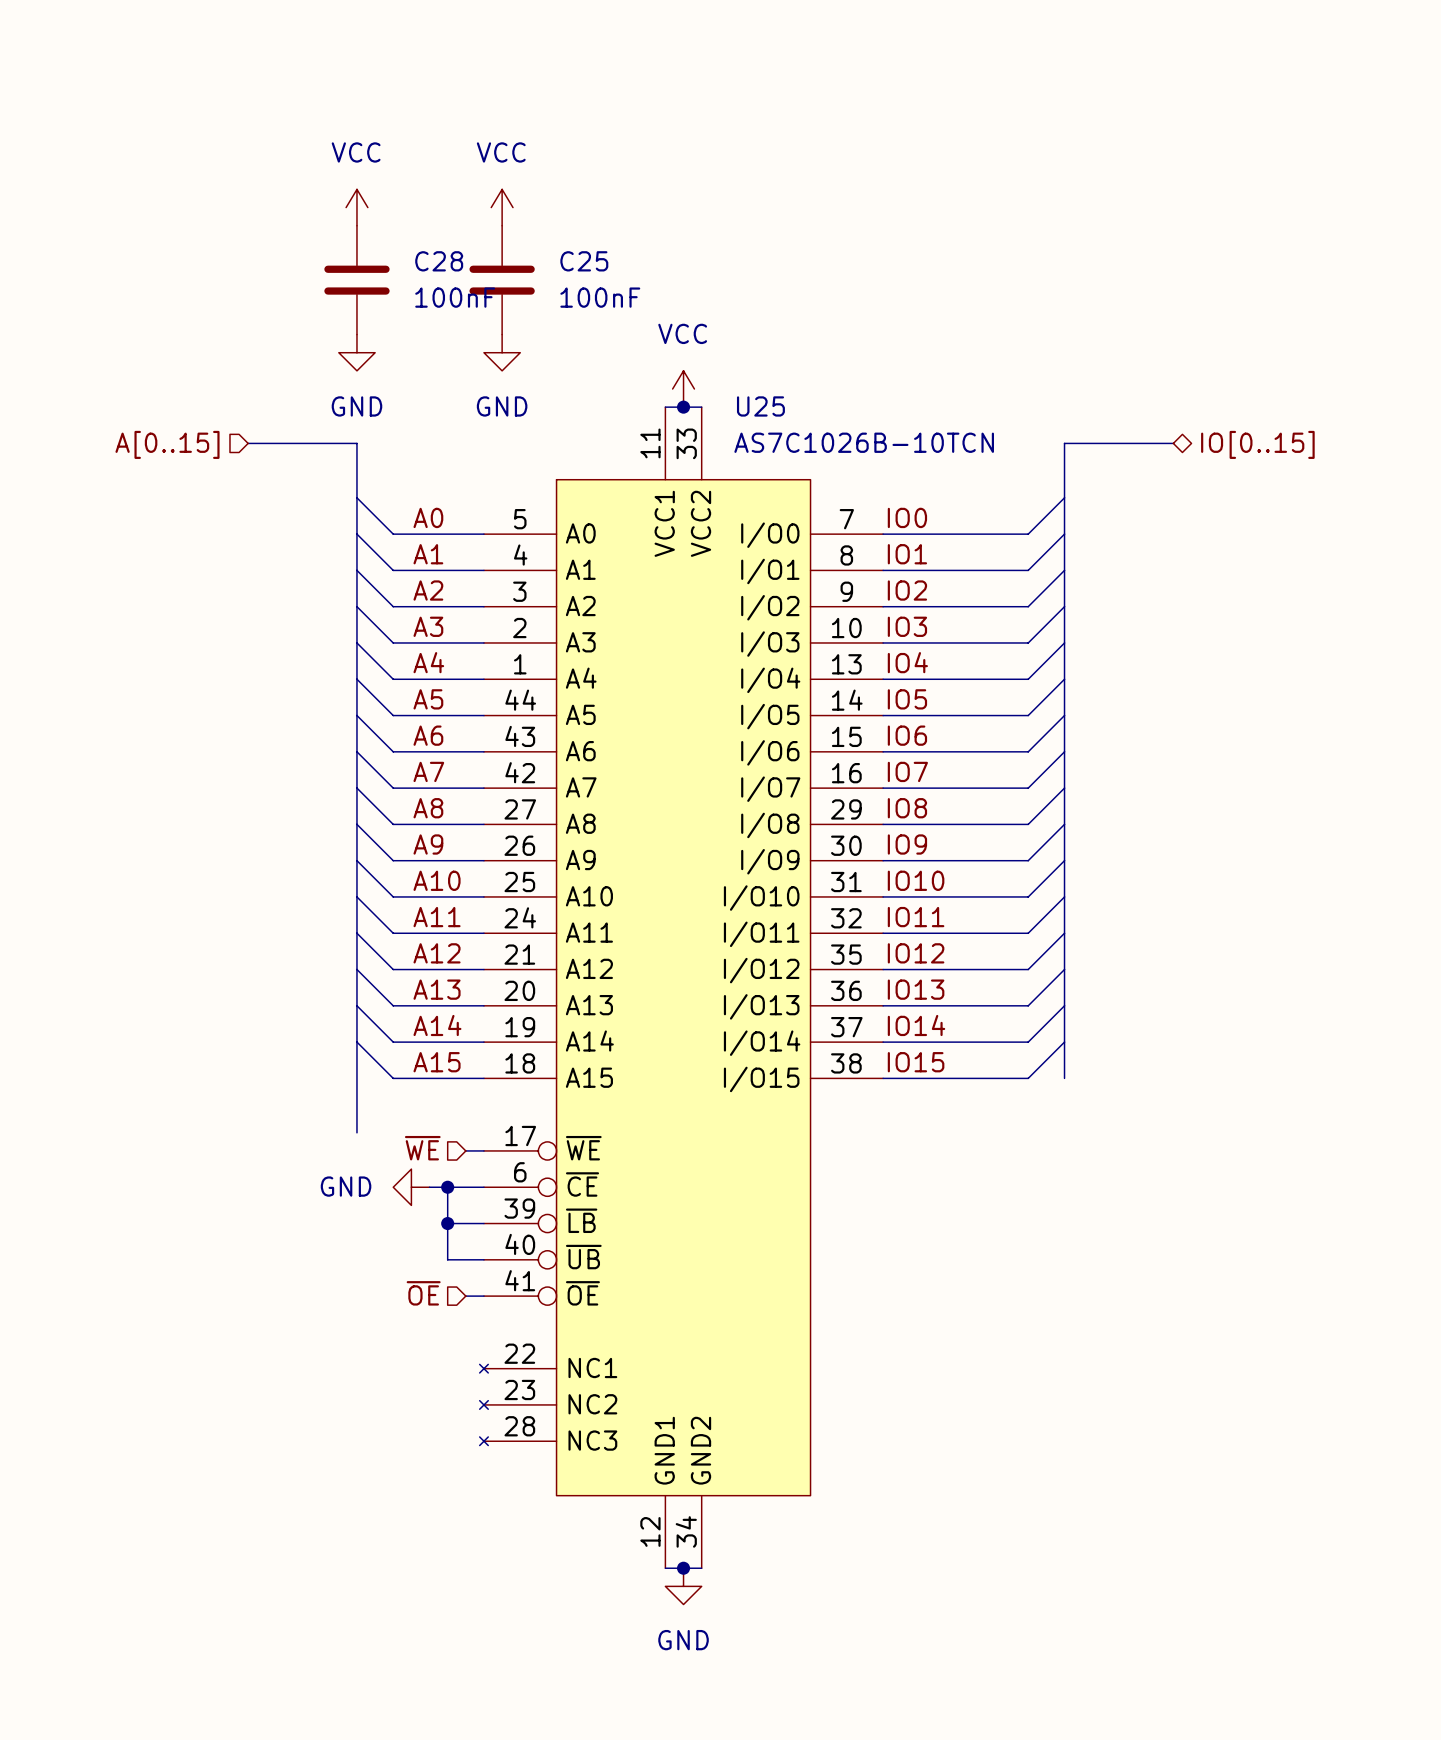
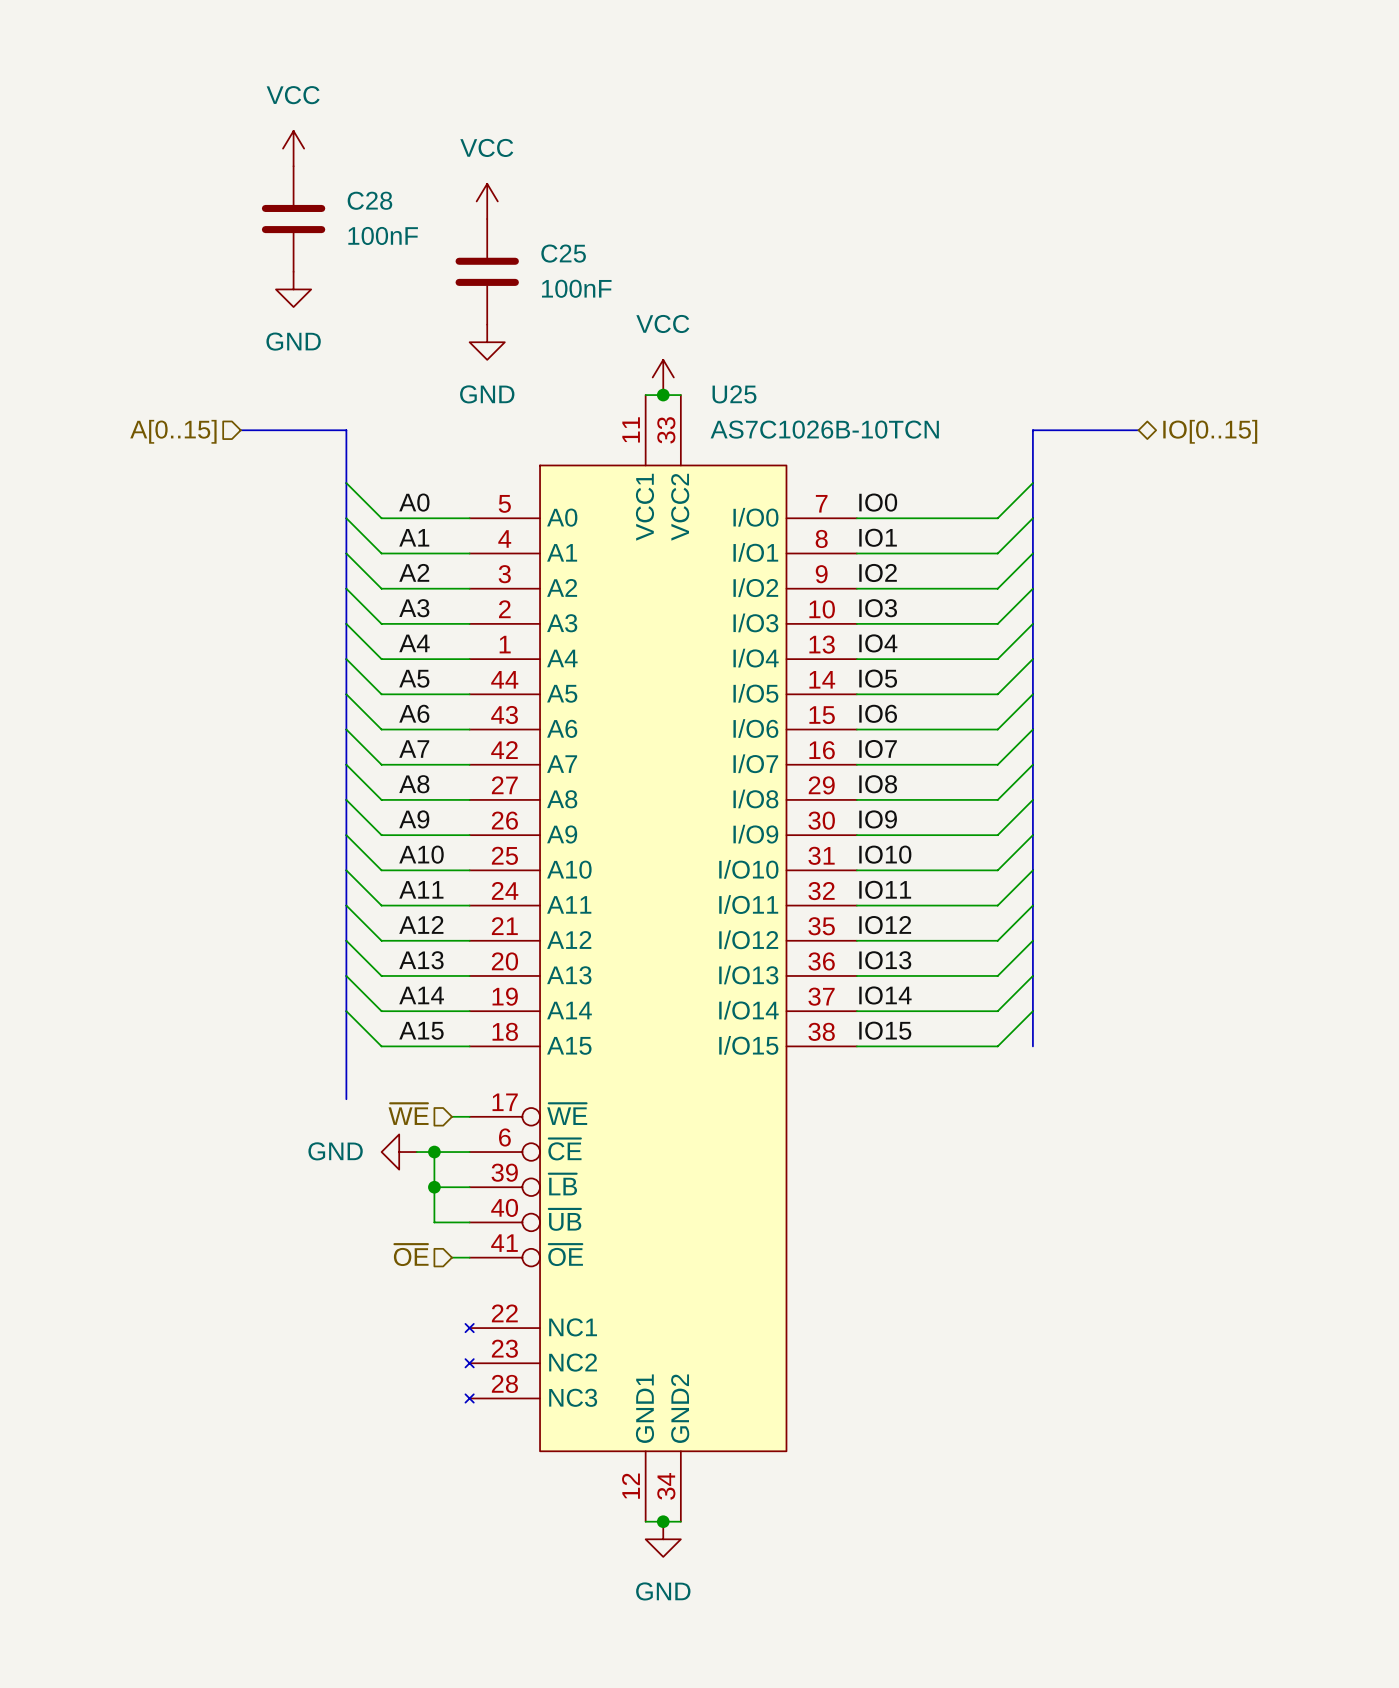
power symbol position: VCC (356, 207) -> VCC (293, 148)
C28 position: (356, 280) -> (293, 219)
power symbol position: GND (356, 352) -> GND (293, 289)

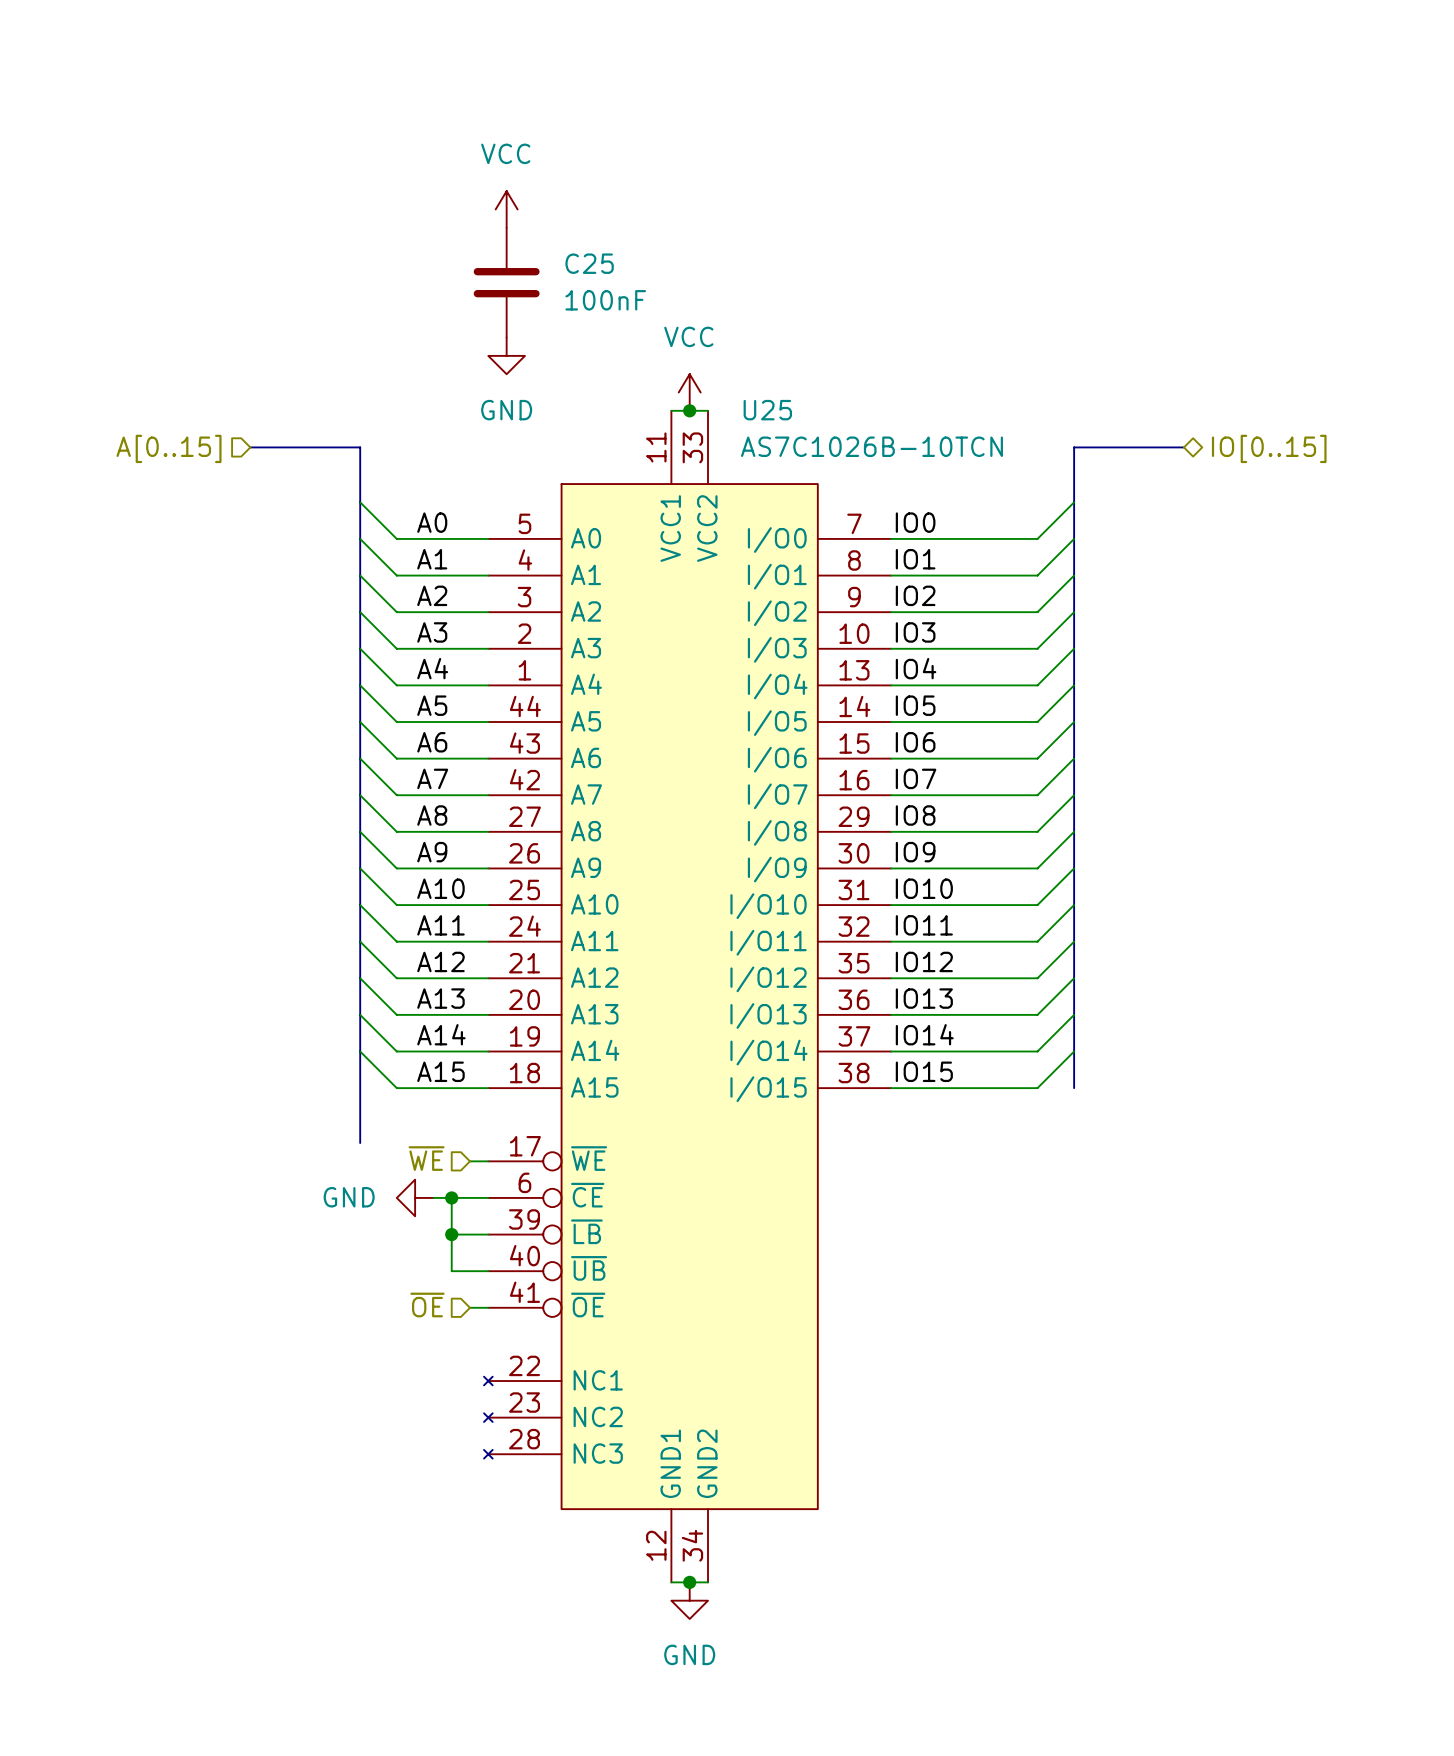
power symbol: VCC (293, 148) -> none
C28: 100nF (293, 219) -> none
power symbol: GND (293, 289) -> none

